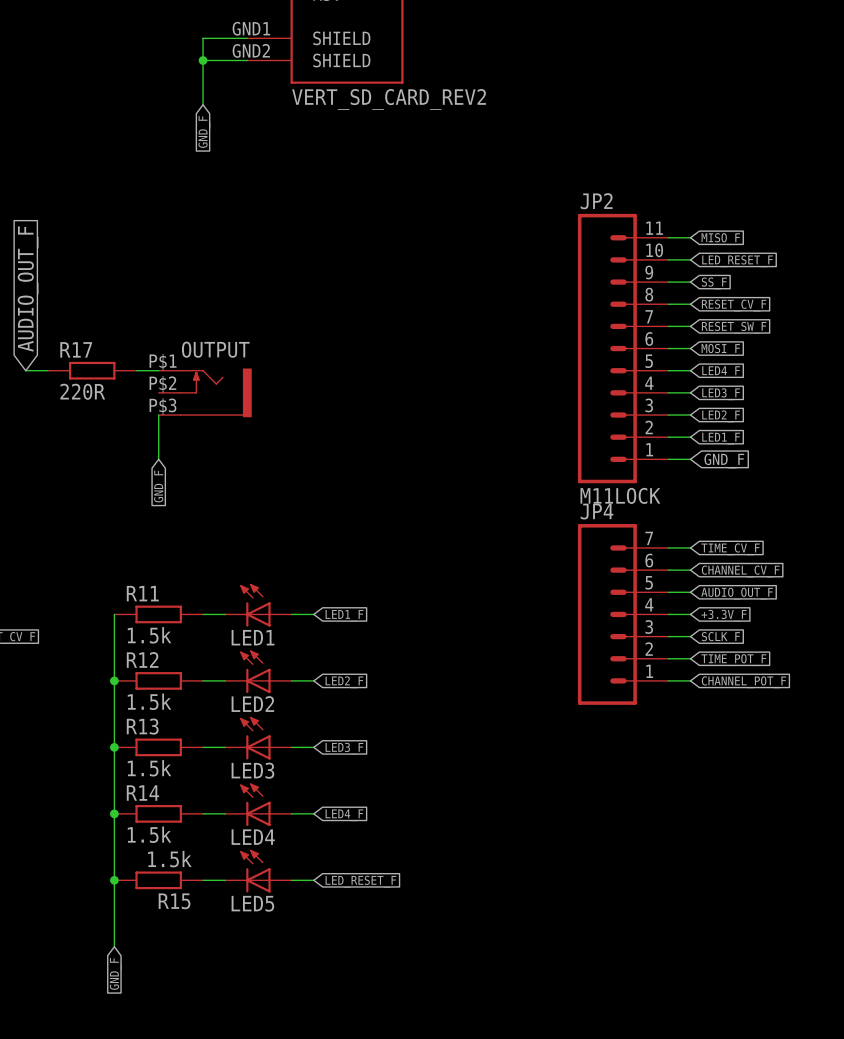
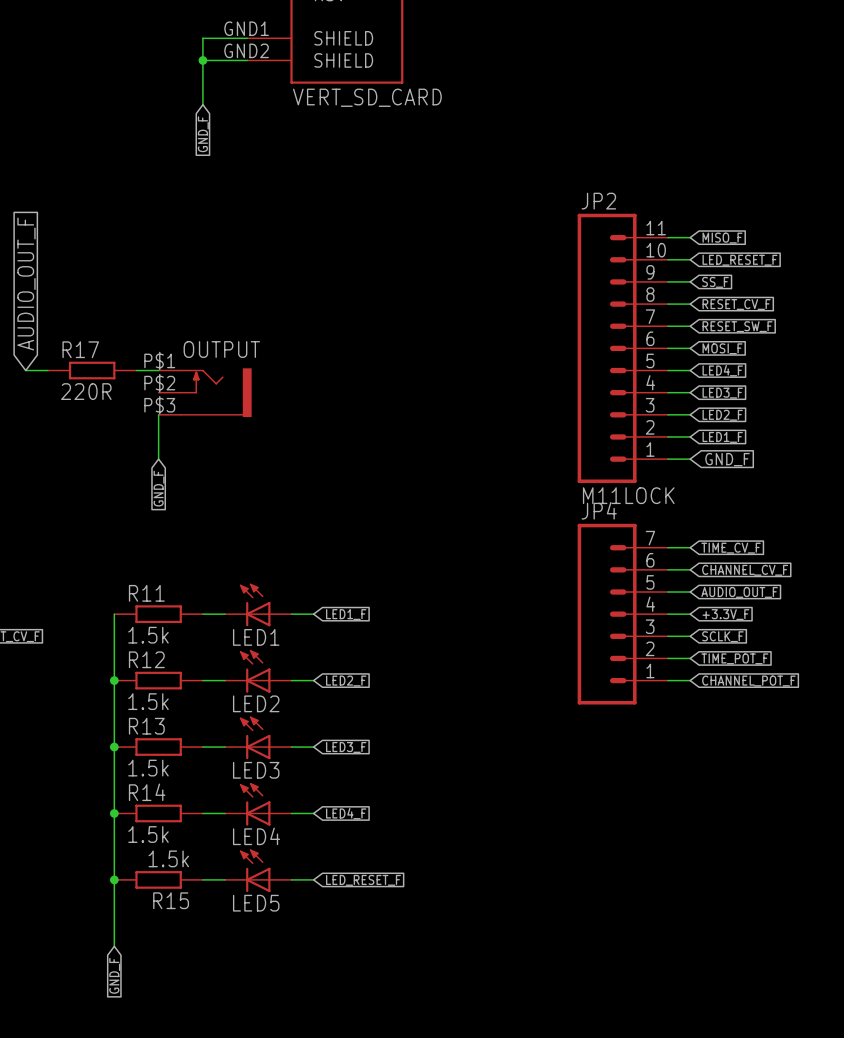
part value: VERT_SD_CARD_REV2 (389, 99) -> VERT_SD_CARD (367, 97)

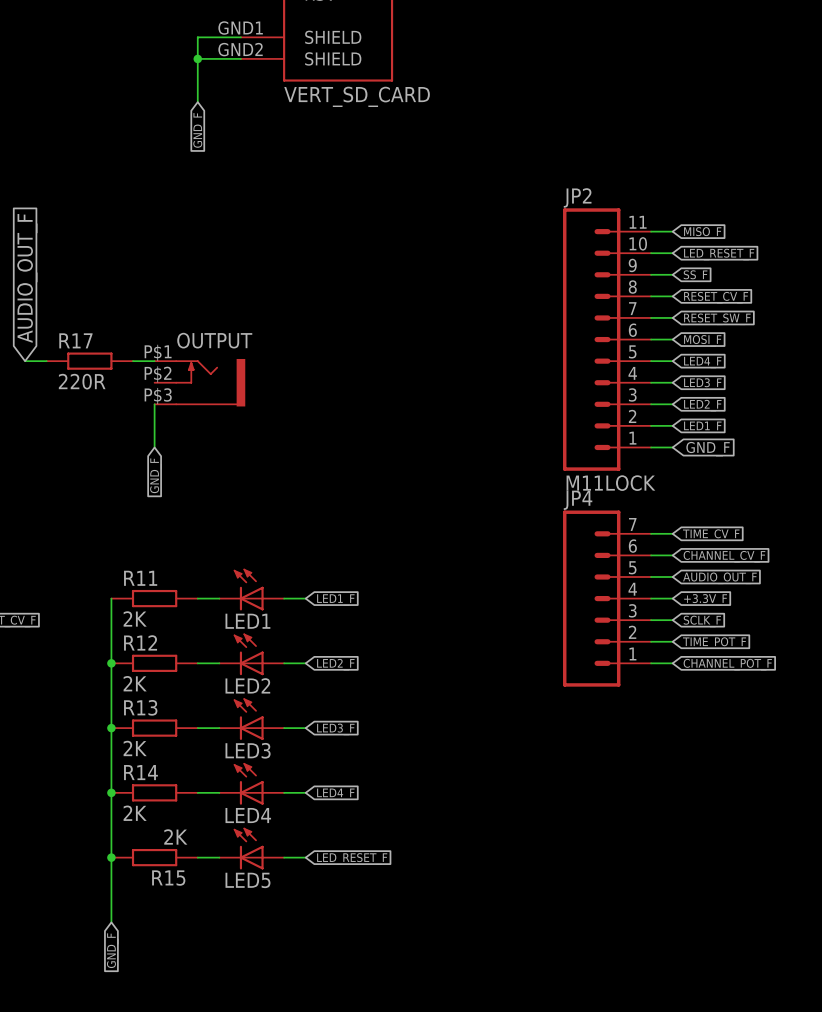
R11 value: 1.5k (148, 635) -> 2K (135, 618)
R12 value: 1.5k (148, 701) -> 2K (135, 683)
R13 value: 1.5k (148, 768) -> 2K (135, 748)
R14 value: 1.5k (148, 834) -> 2K (135, 813)
R15 value: 1.5k (168, 858) -> 2K (175, 836)

